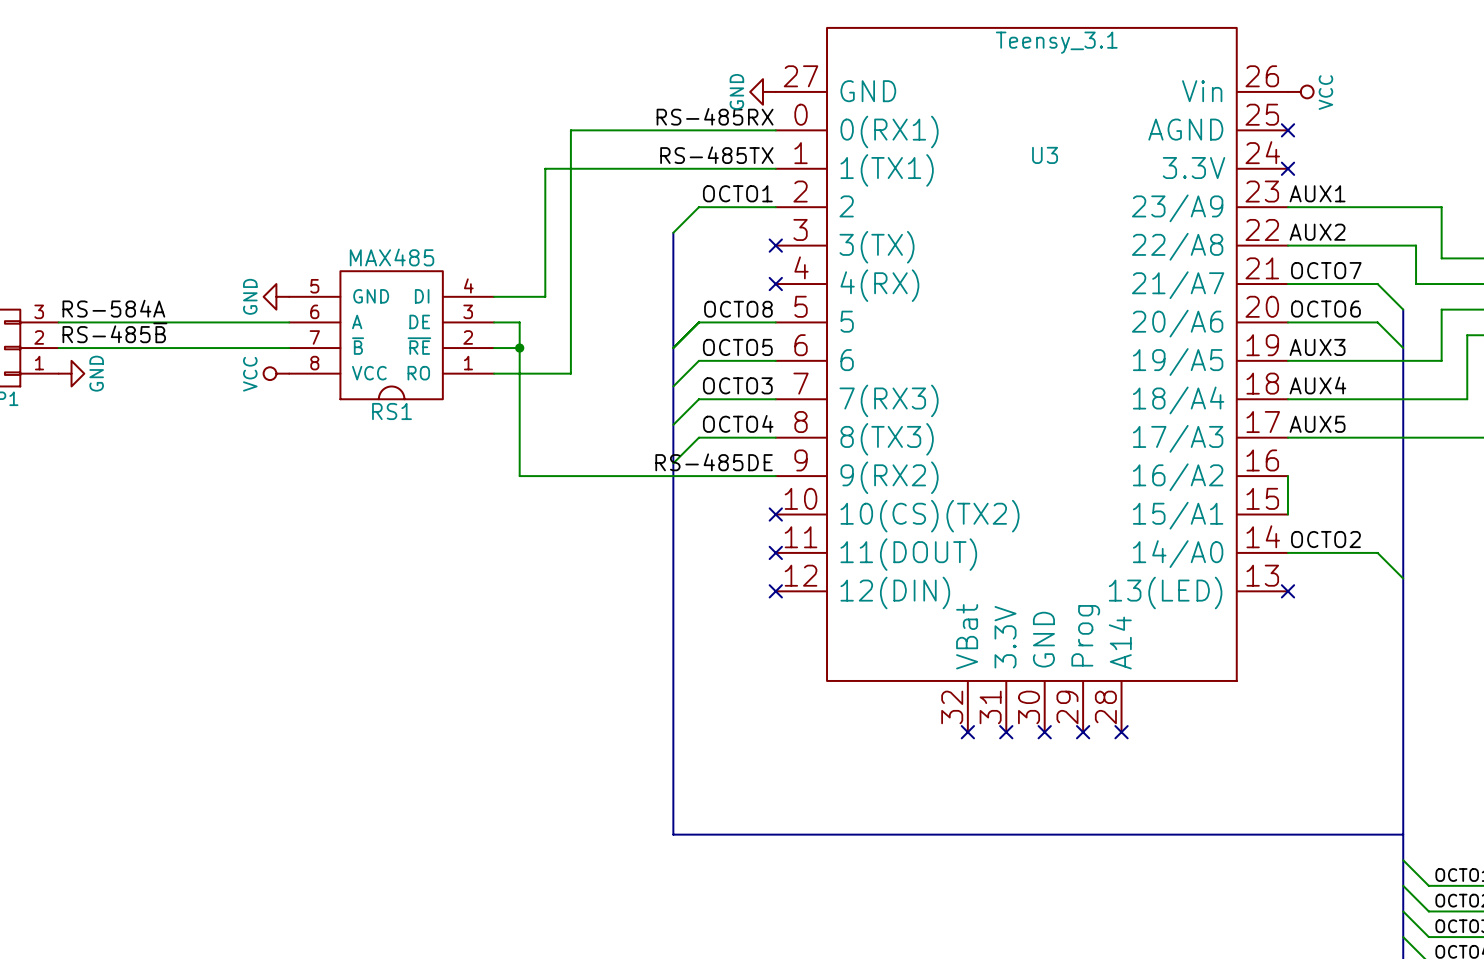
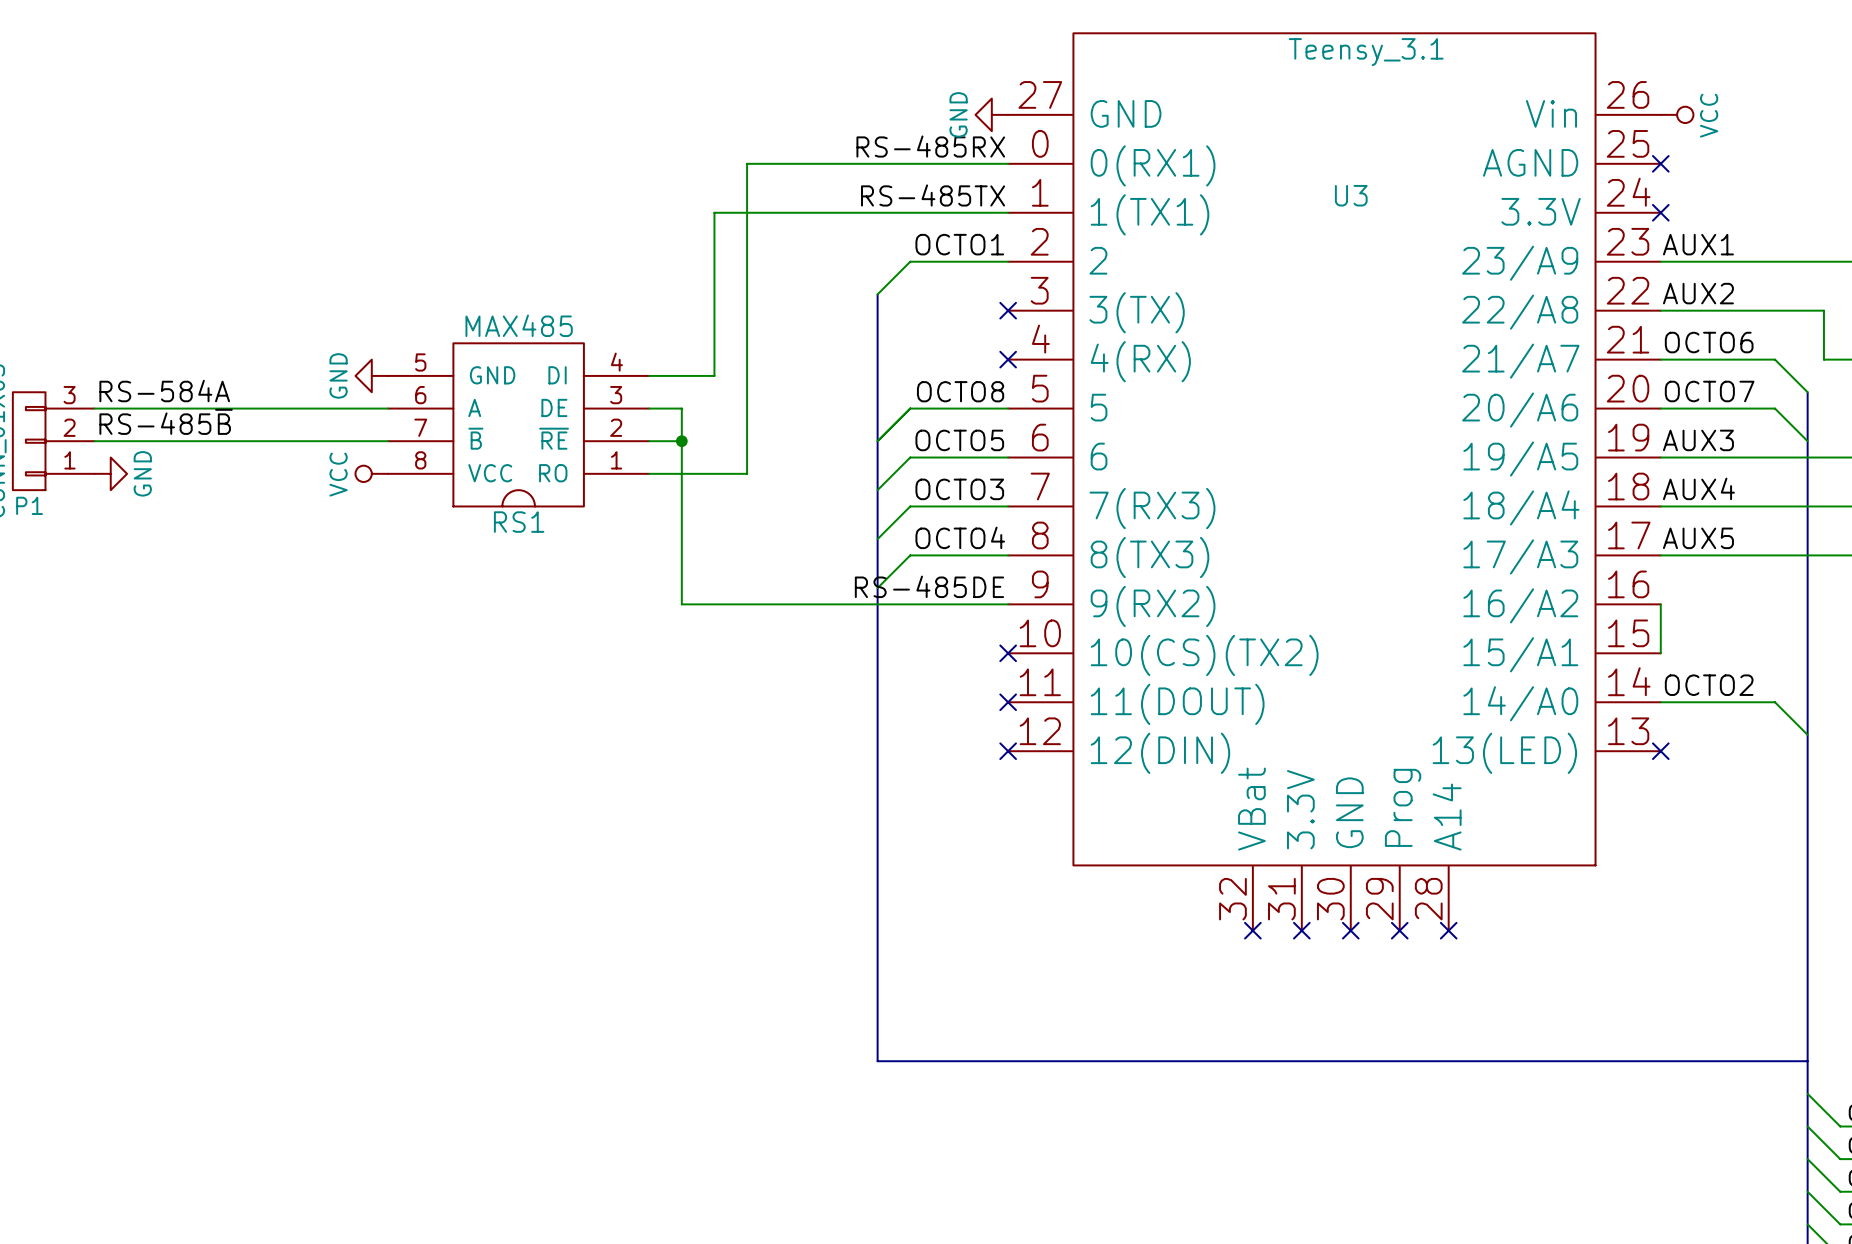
label: OCTO7 (1326, 270) -> OCTO6 (1709, 342)
label: OCTO6 (1325, 309) -> OCTO7 (1709, 391)

